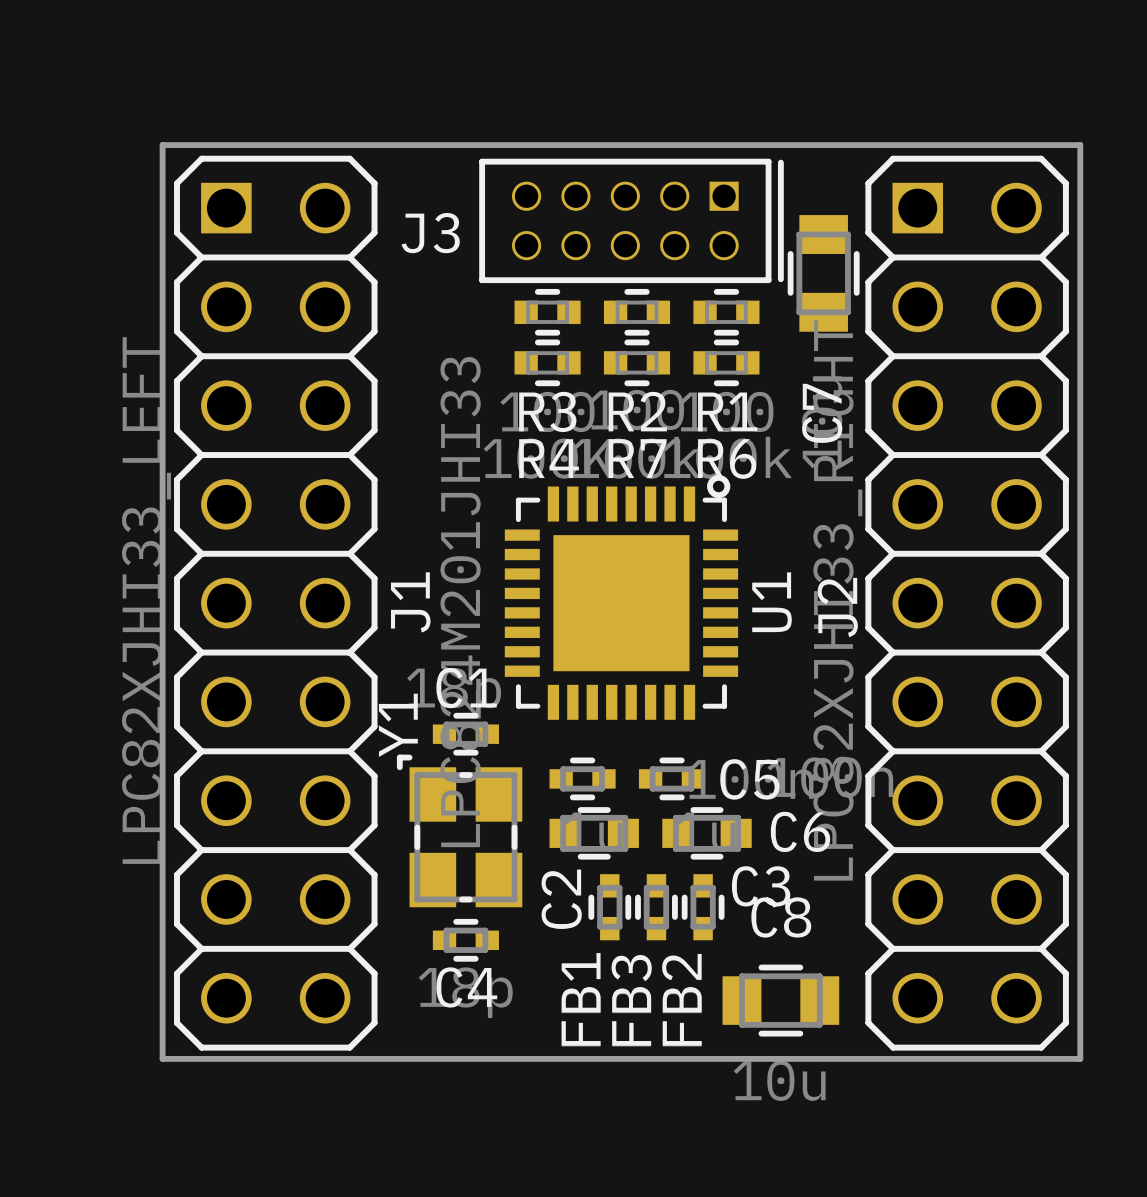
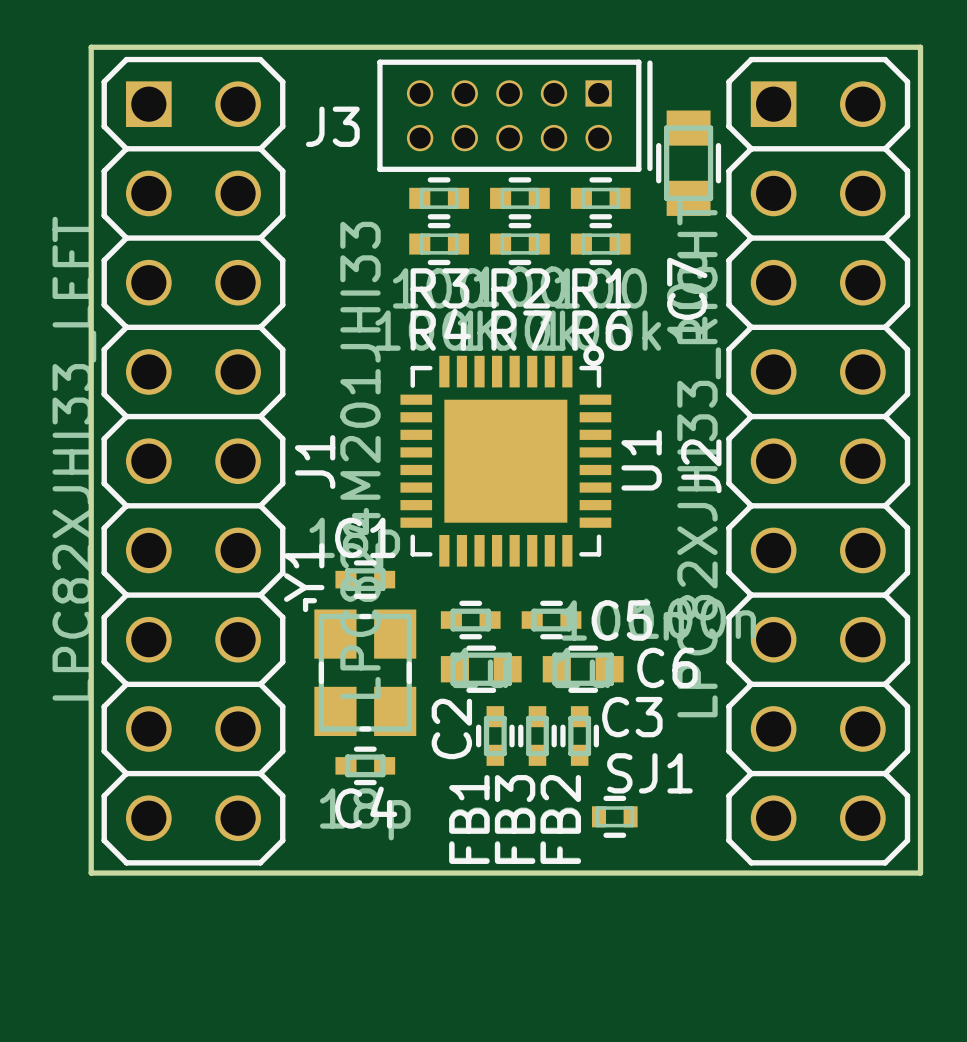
SJ1: none -> (614, 816)
C8: 10u (780, 1000) -> none

